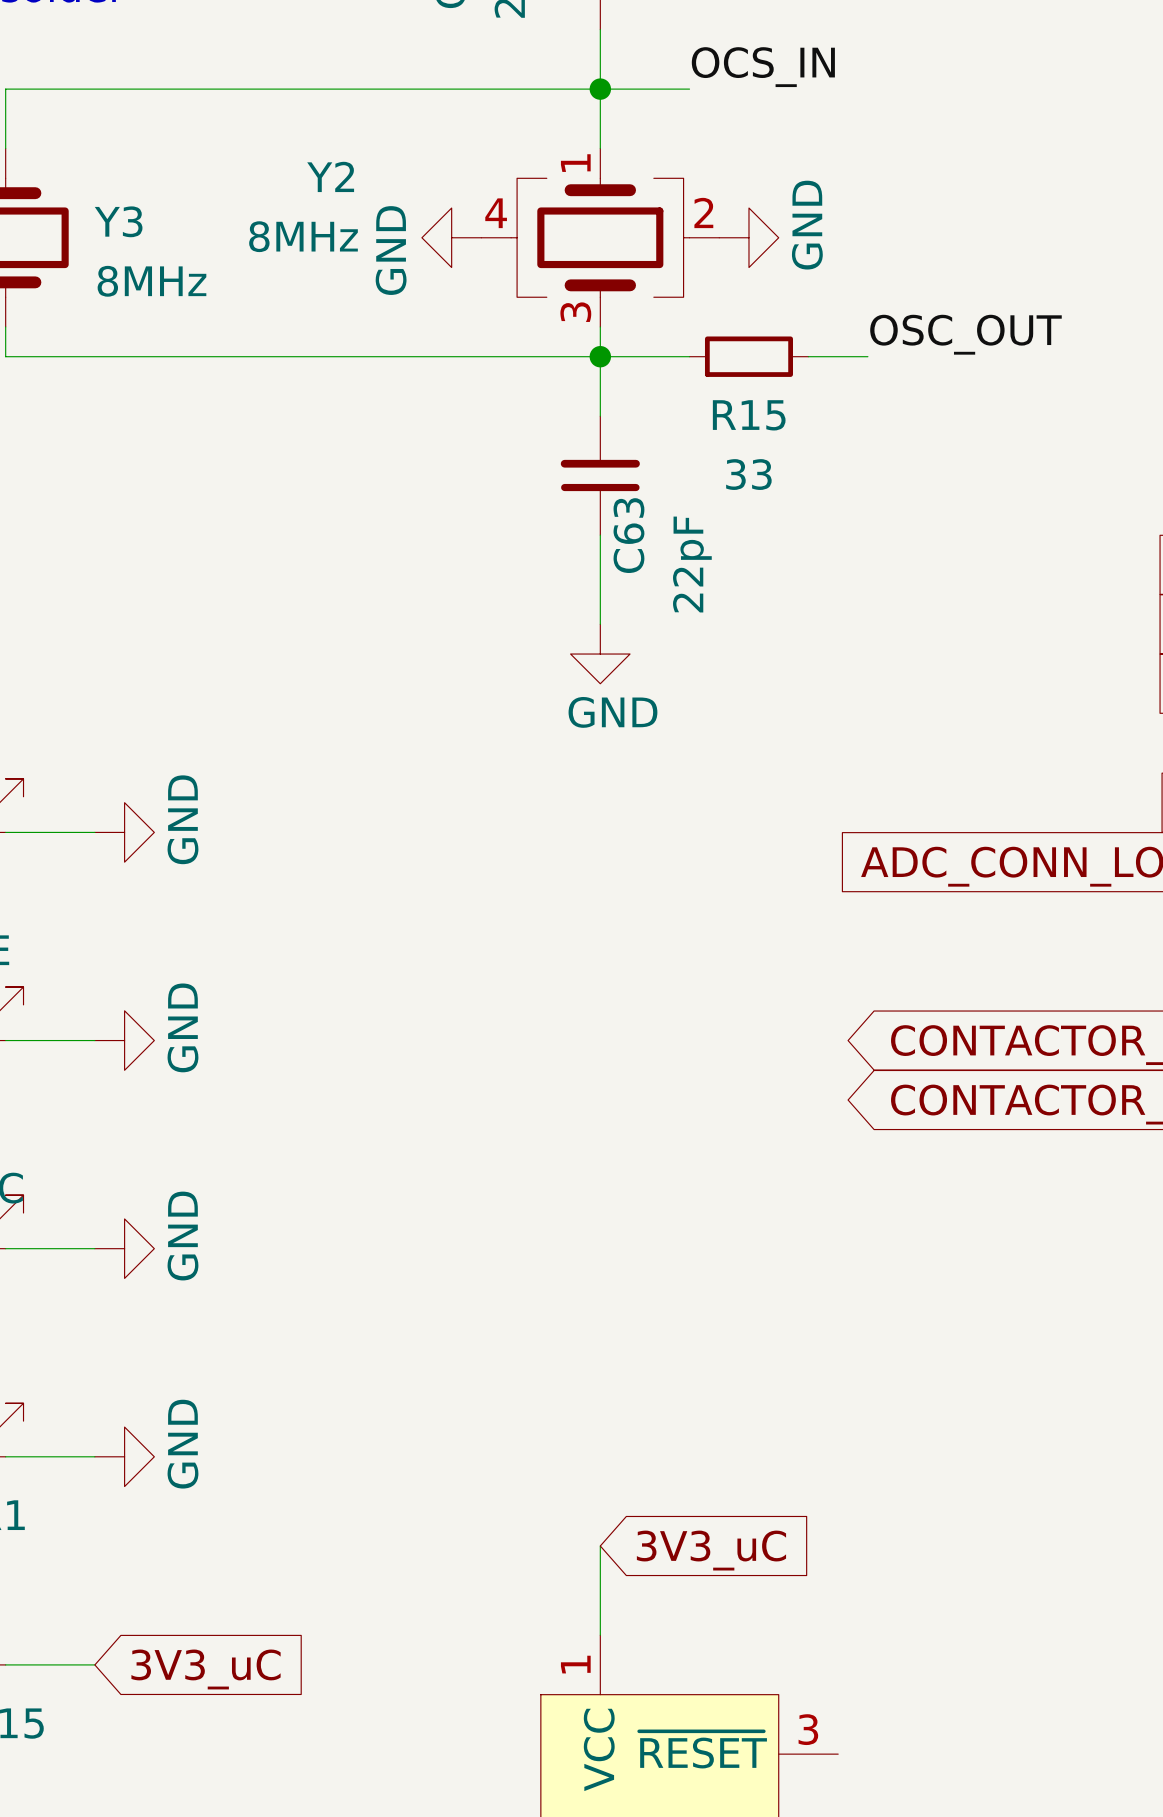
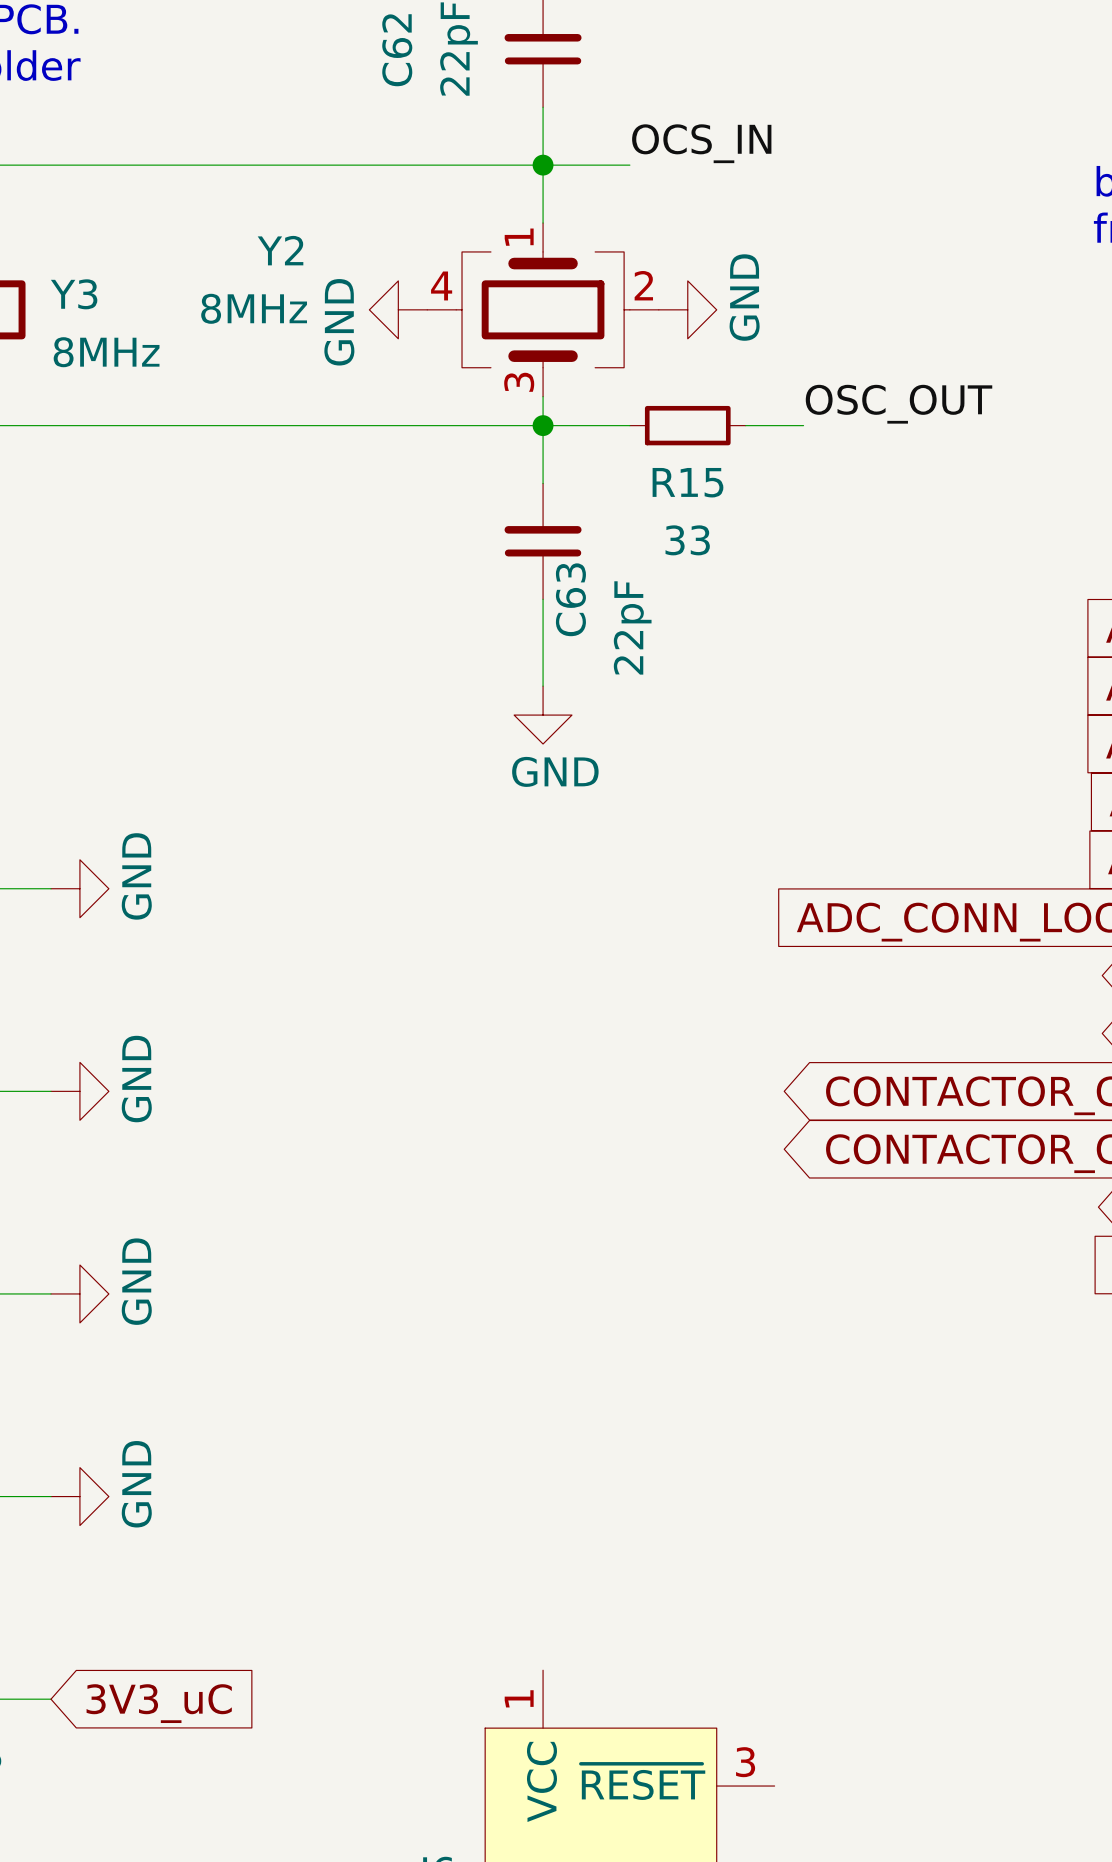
wire: (600, 1546) (600, 1635) -> none
global label: 3V3_uC (711, 1550) -> none

